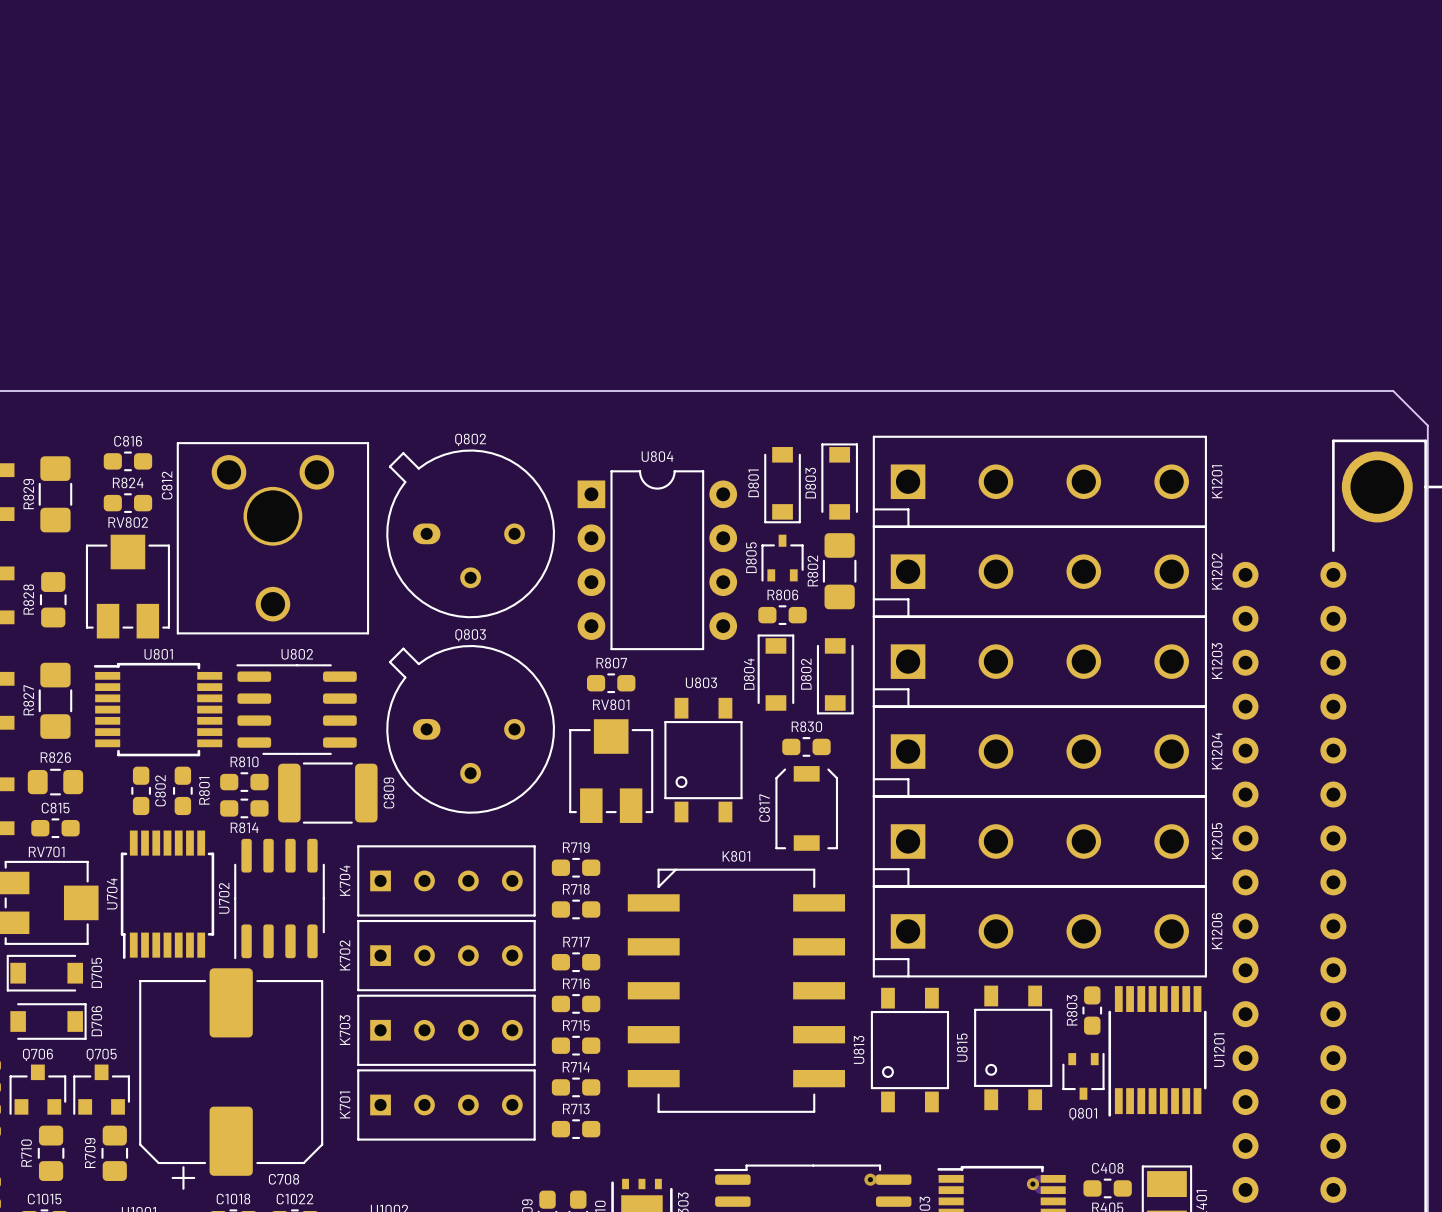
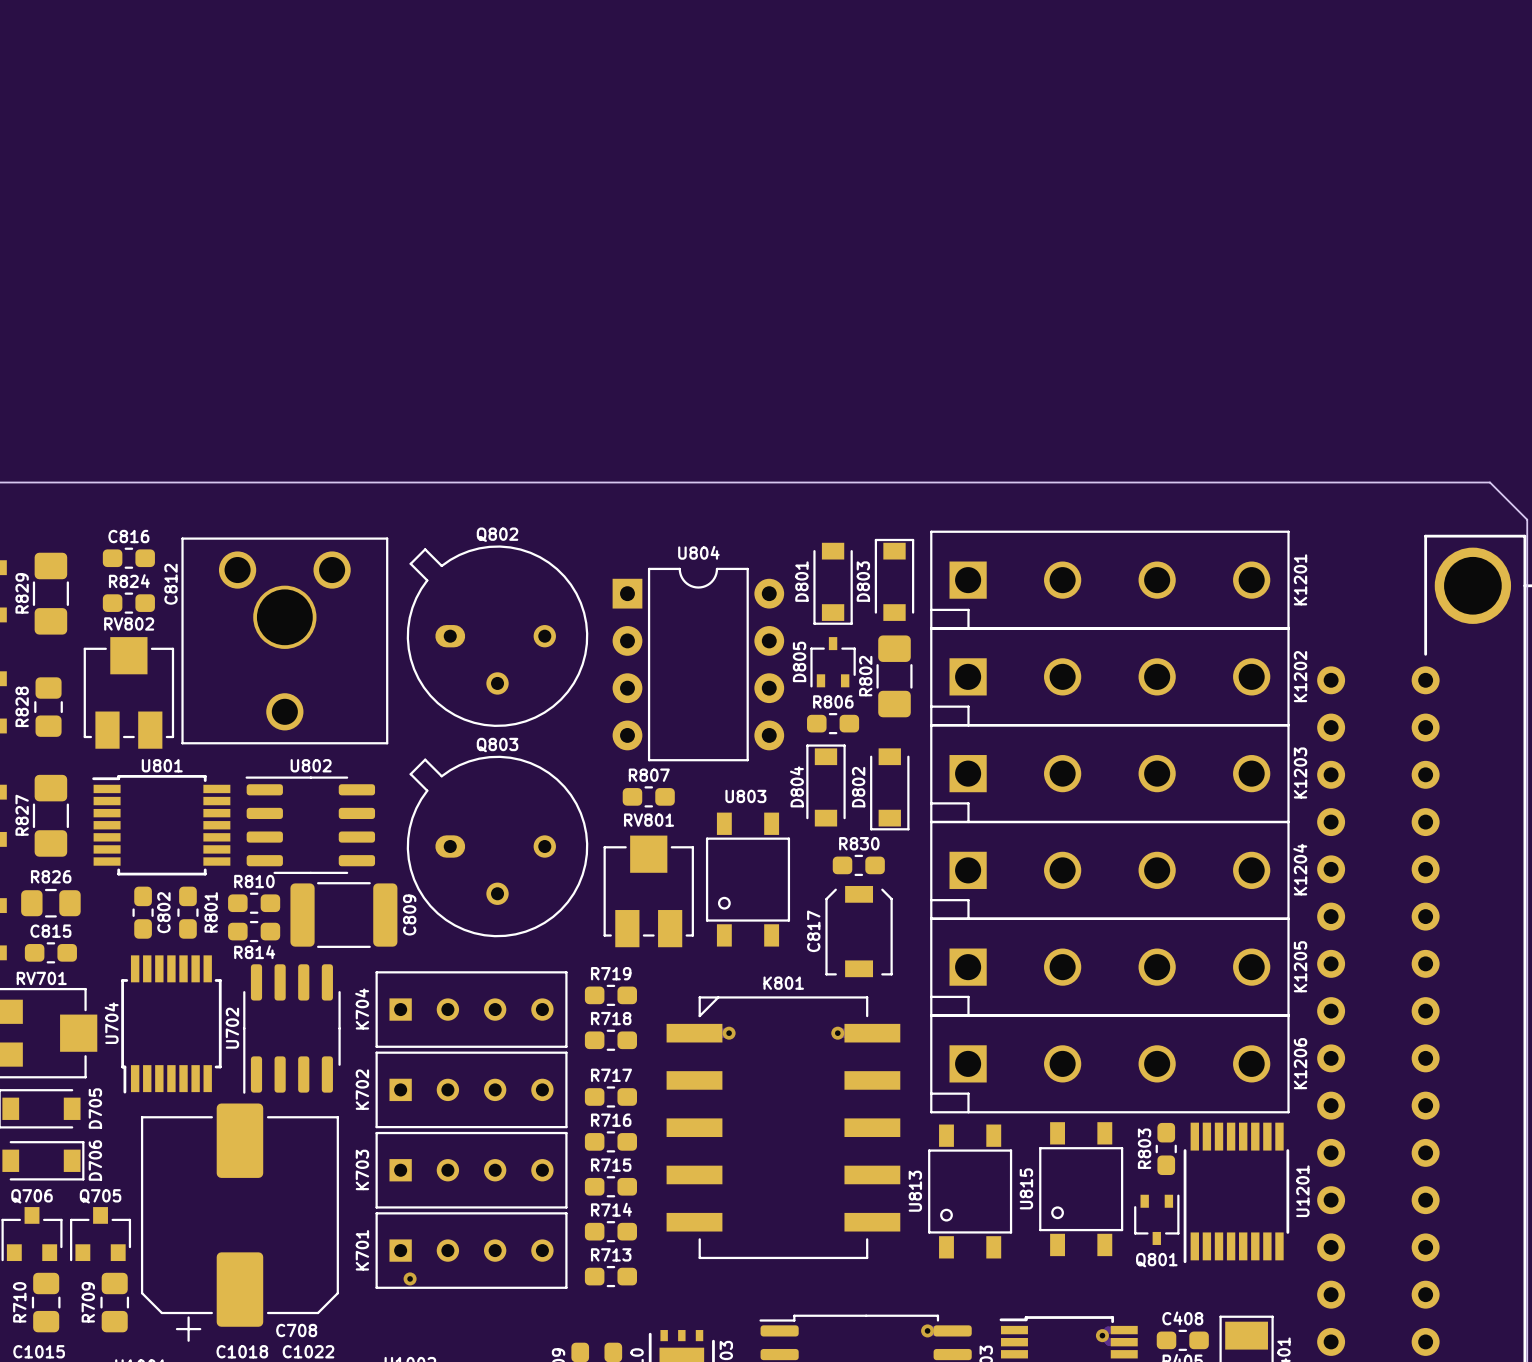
via: none -> (729, 1033)
via: none -> (837, 1033)
via: none -> (410, 1278)

